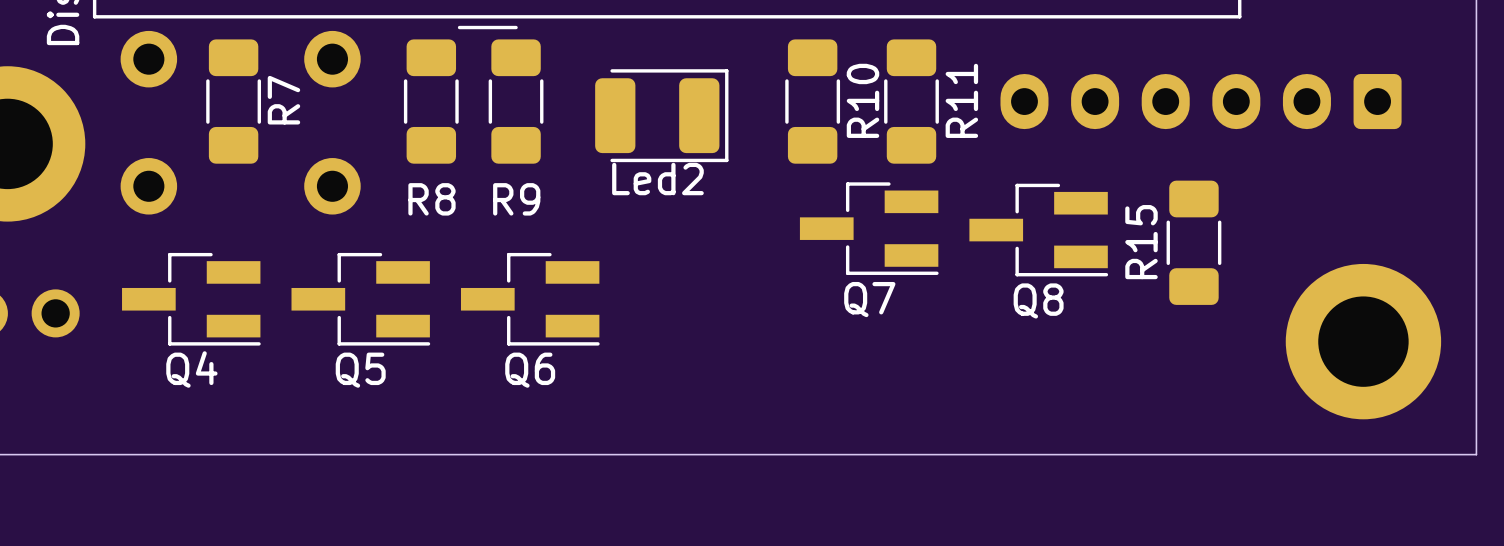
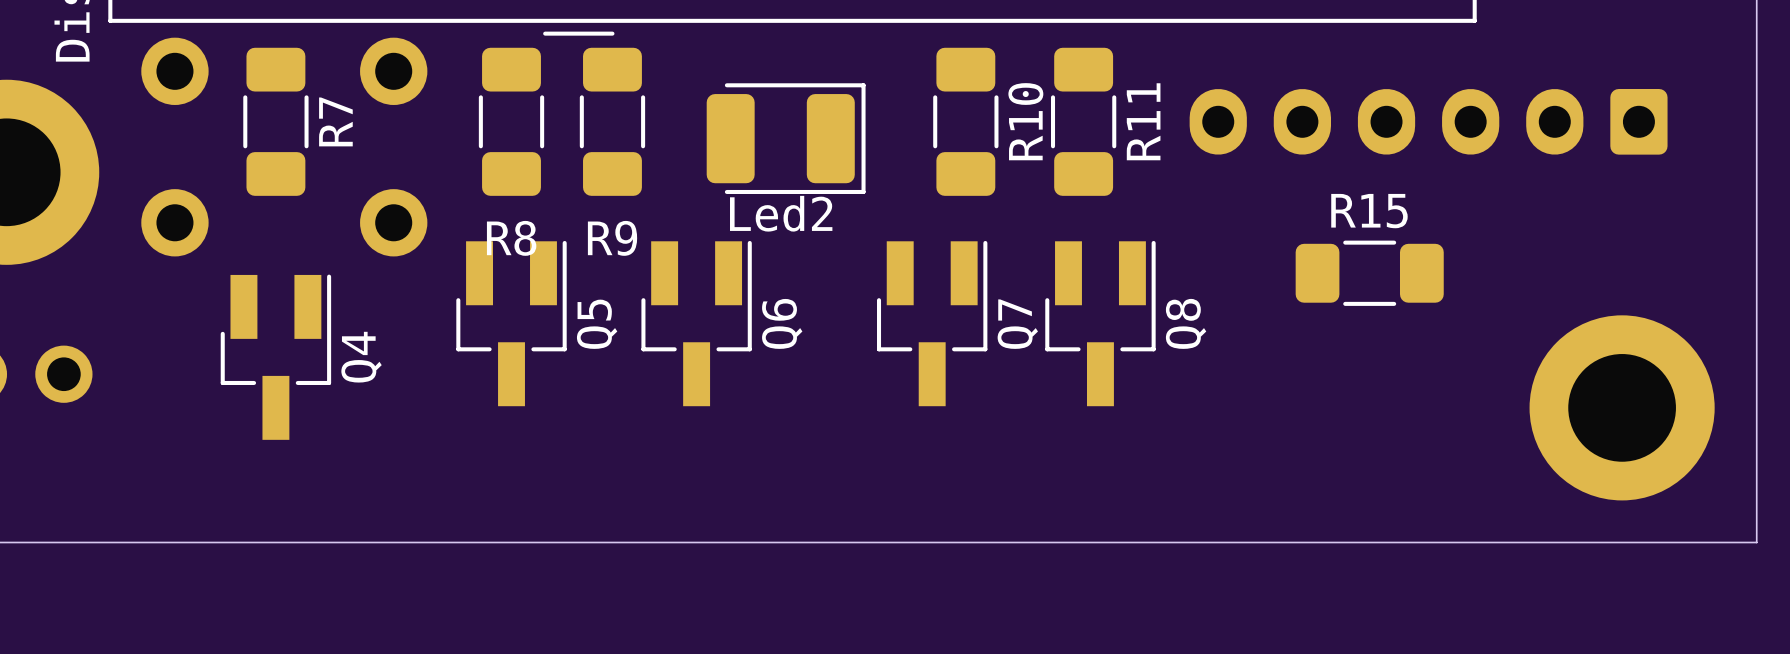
Q7 rotation: 0° (869, 228) -> 90° counterclockwise (932, 323)
Q7 position: (869, 228) -> (932, 323)
Q8 rotation: 0° (1038, 230) -> 90° counterclockwise (1100, 323)
Q8 position: (1038, 230) -> (1100, 323)
R15 rotation: 0° (1193, 242) -> 90° clockwise (1369, 273)
Q4 rotation: 0° (191, 299) -> 90° counterclockwise (275, 357)
Q5 rotation: 0° (360, 299) -> 90° counterclockwise (511, 323)
Q6 rotation: 0° (530, 299) -> 90° counterclockwise (696, 323)

